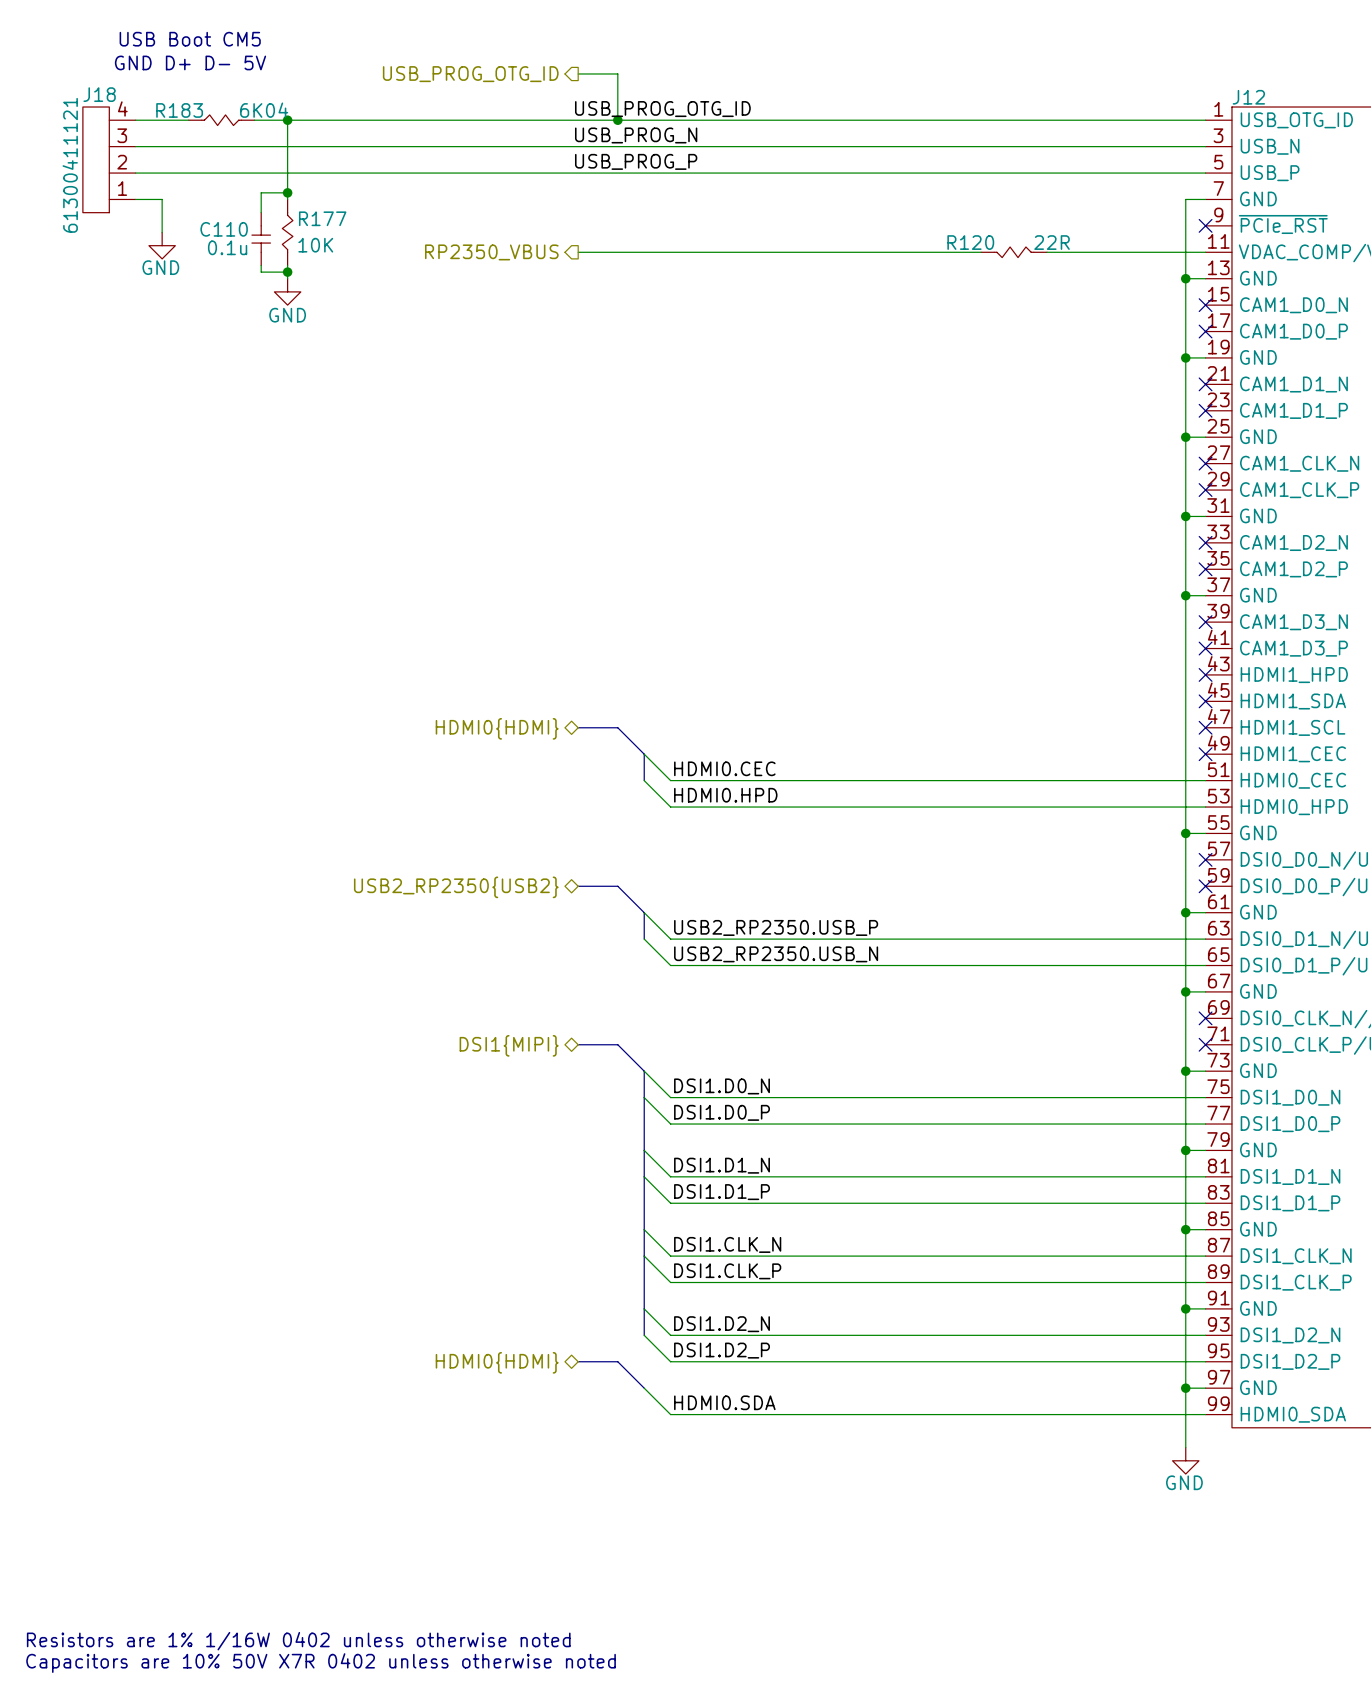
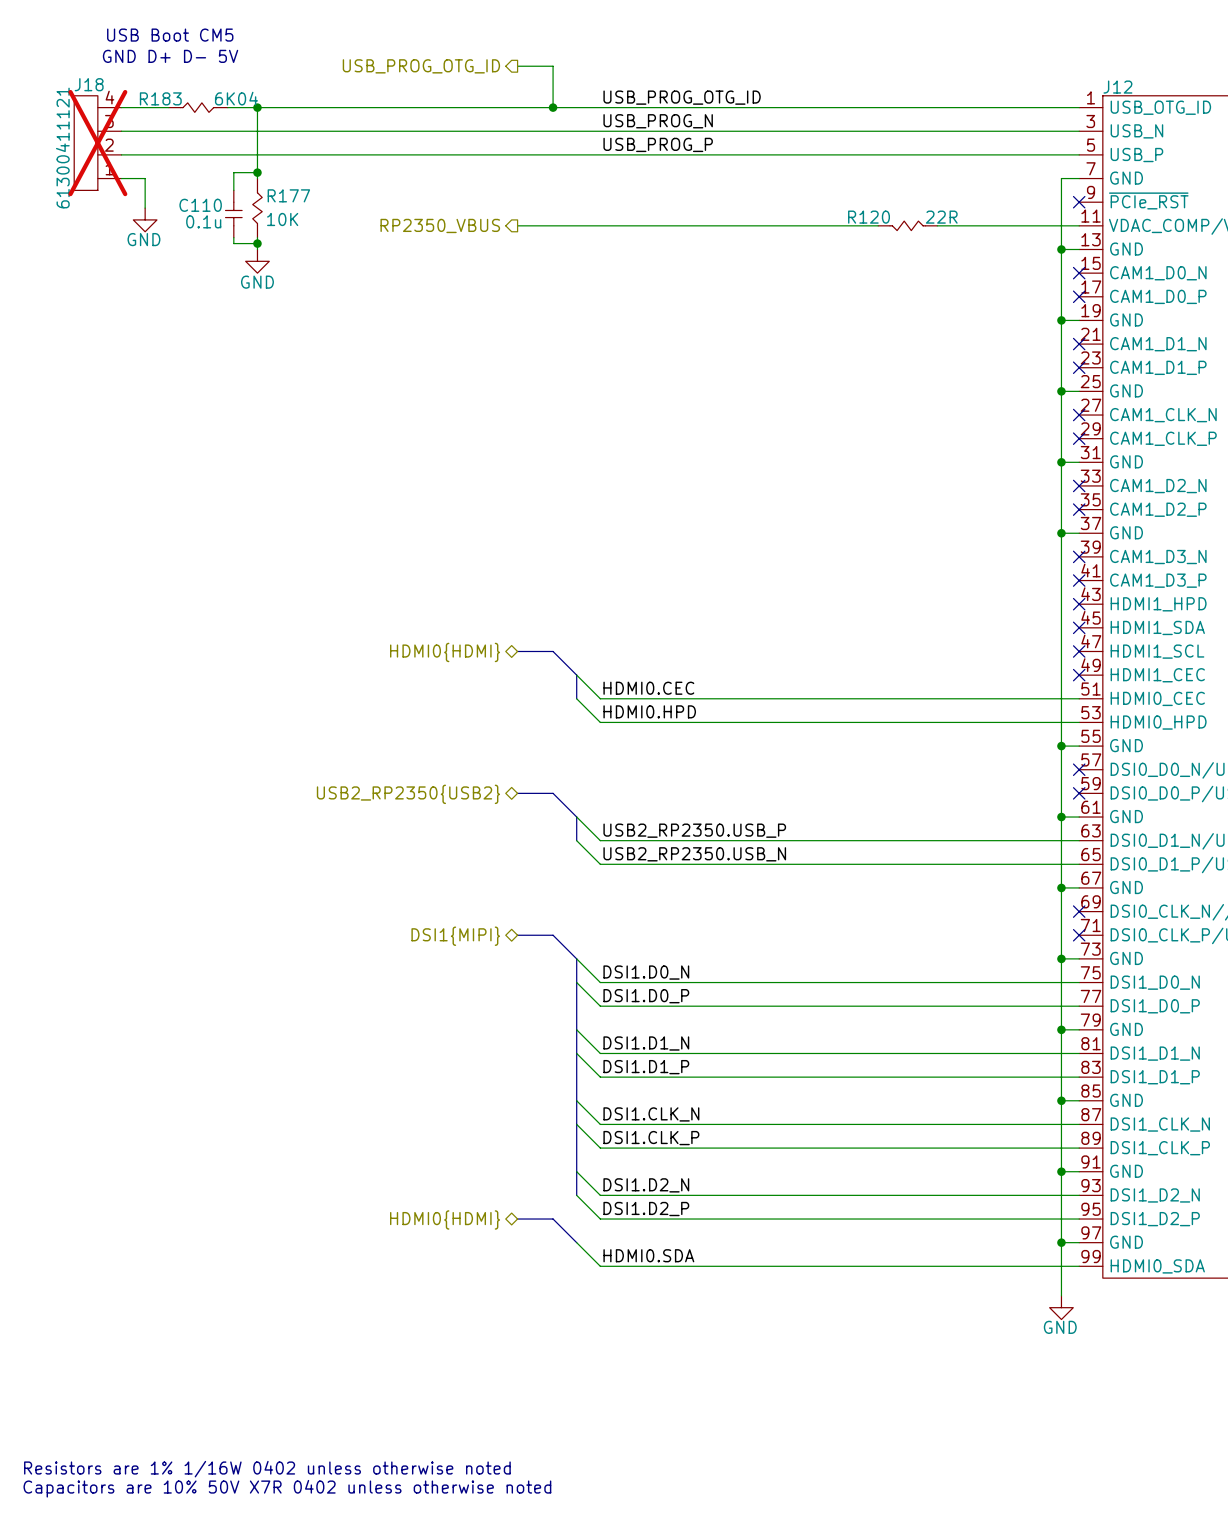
label position: USB_PROG_OTG_ID (662, 109) -> USB_PROG_OTG_ID (682, 97)
label position: USB_PROG_N (636, 135) -> USB_PROG_N (658, 121)
J18 do-not-place cross: none -> (97, 143)
label position: USB_PROG_P (636, 161) -> USB_PROG_P (658, 144)

